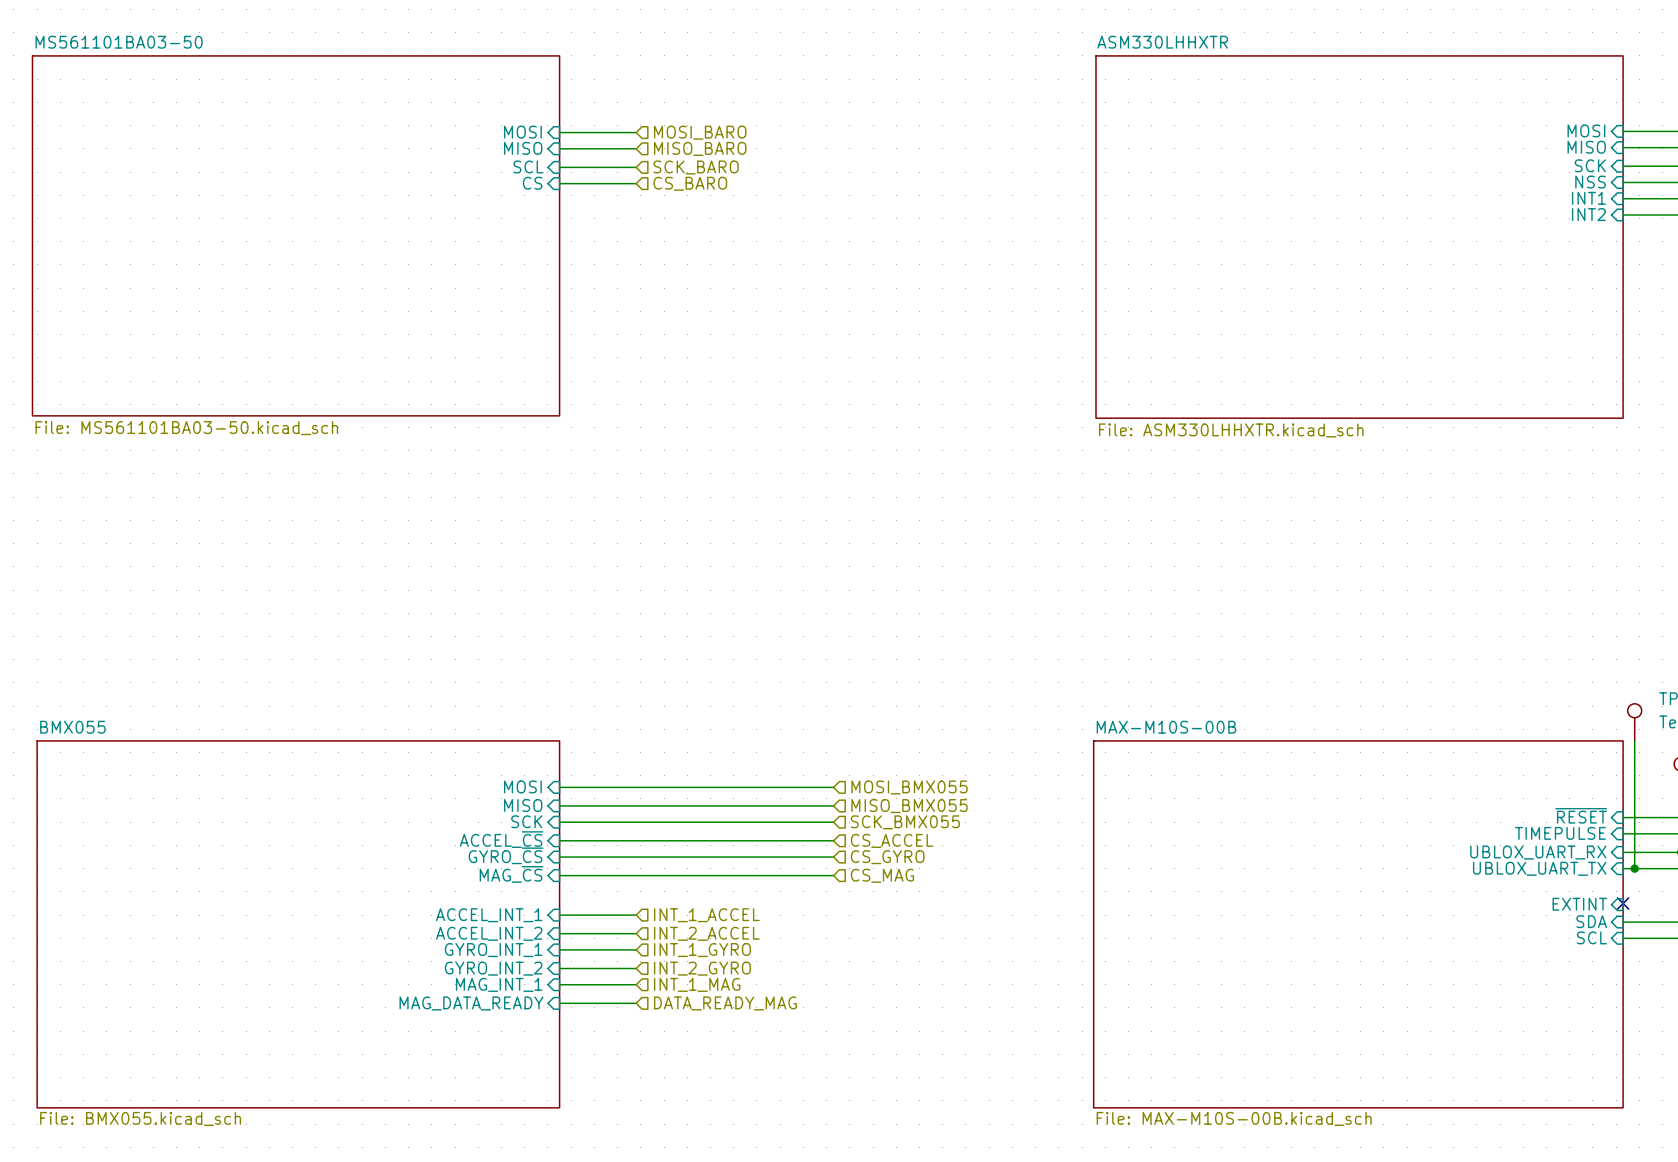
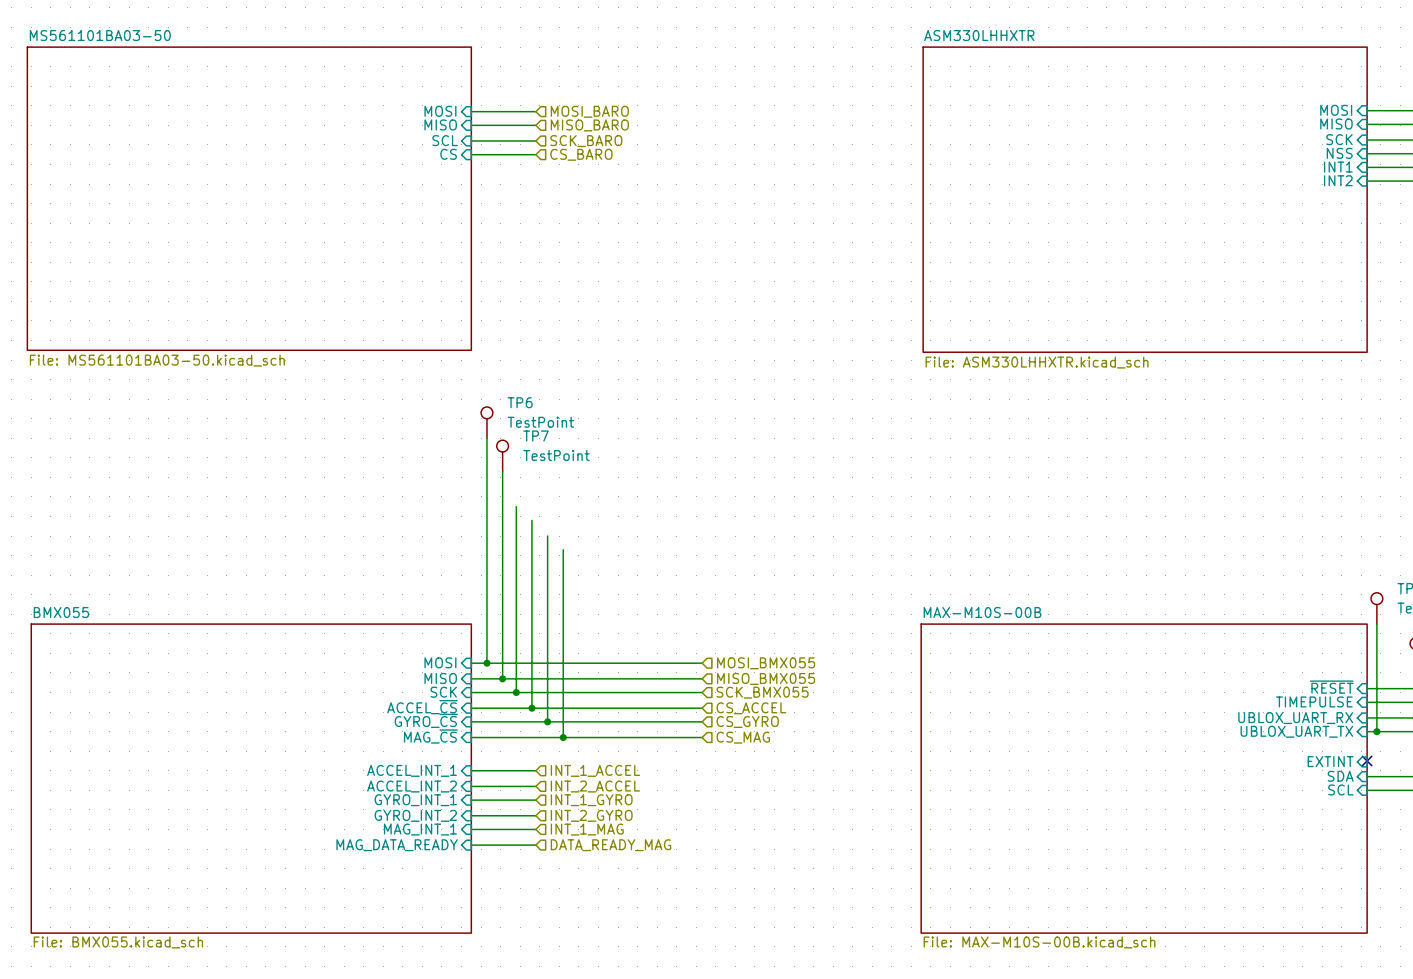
TP6: none -> TestPoint (486, 422)
wire: none -> (486, 438) (486, 663)
TP7: none -> TestPoint (502, 455)
wire: none -> (502, 471) (502, 678)
wire: none -> (516, 506) (516, 692)
wire: none -> (531, 520) (531, 708)
wire: none -> (547, 536) (547, 721)
wire: none -> (563, 549) (563, 737)
junction: none -> (486, 663)
junction: none -> (502, 678)
junction: none -> (516, 692)
junction: none -> (531, 708)
junction: none -> (547, 721)
junction: none -> (563, 737)

